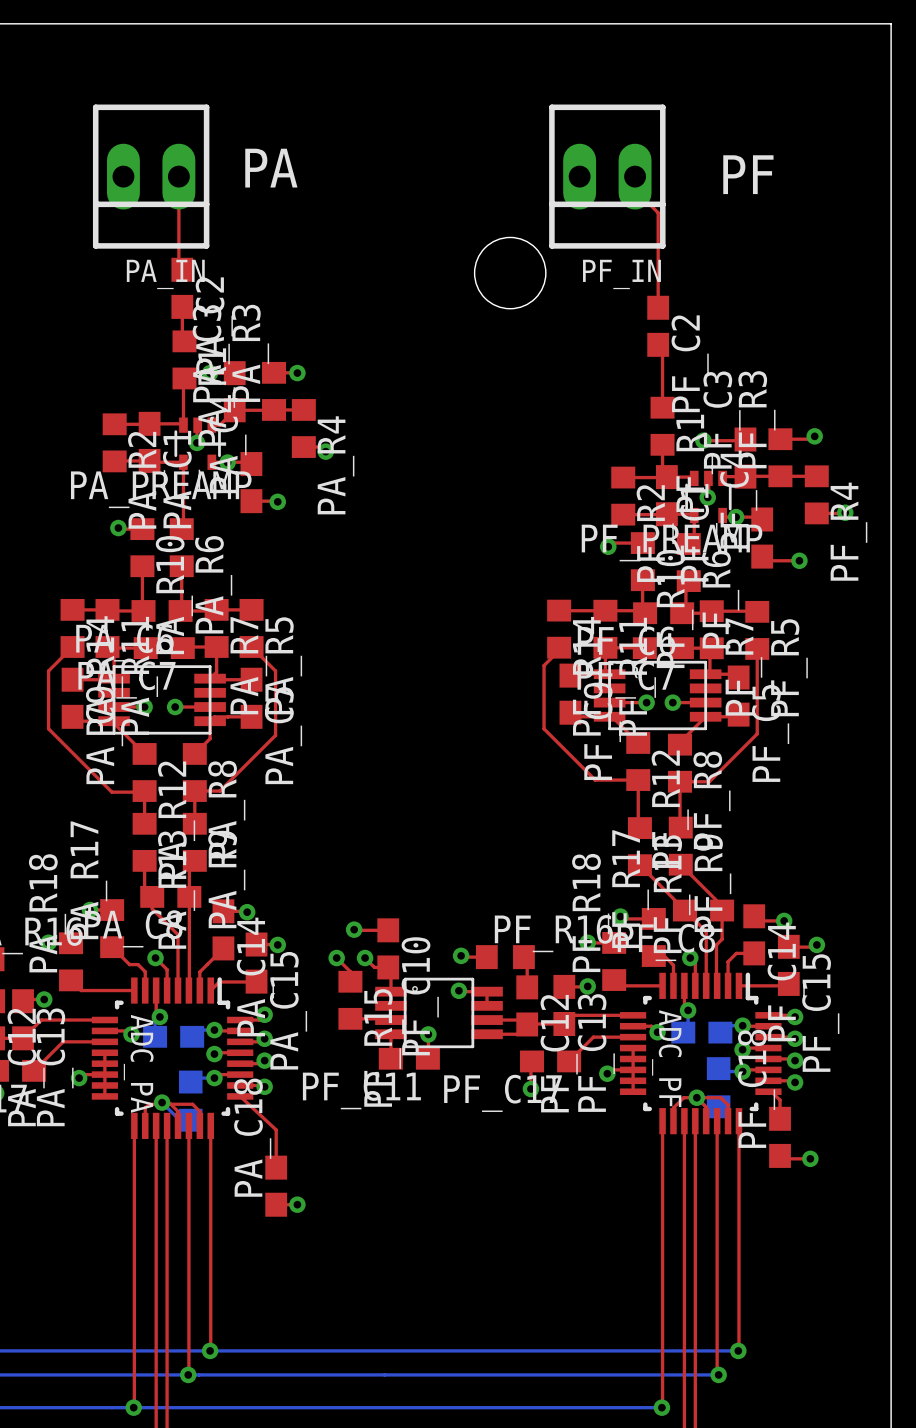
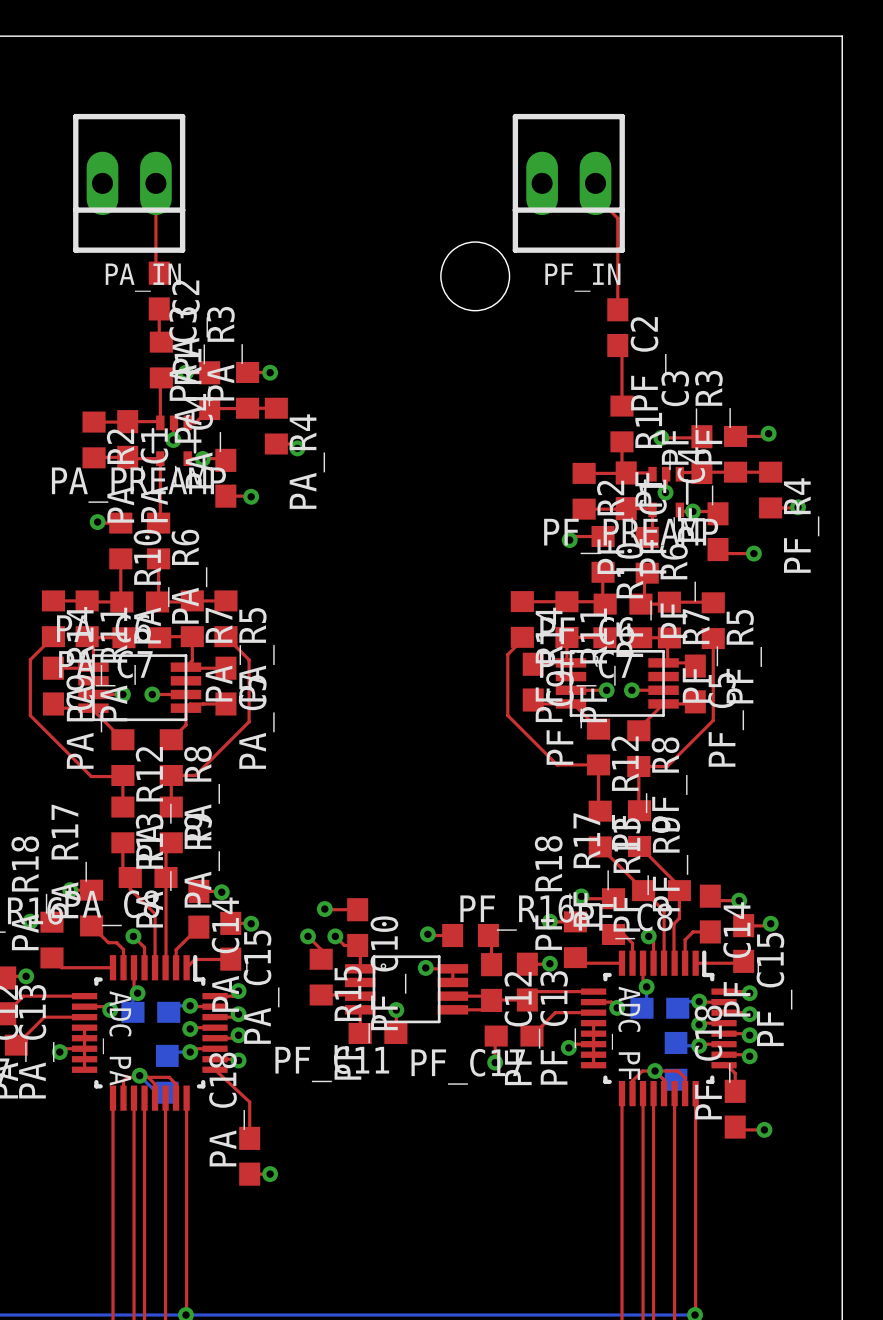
text: PA (271, 168) -> none
text: PF (748, 174) -> none

